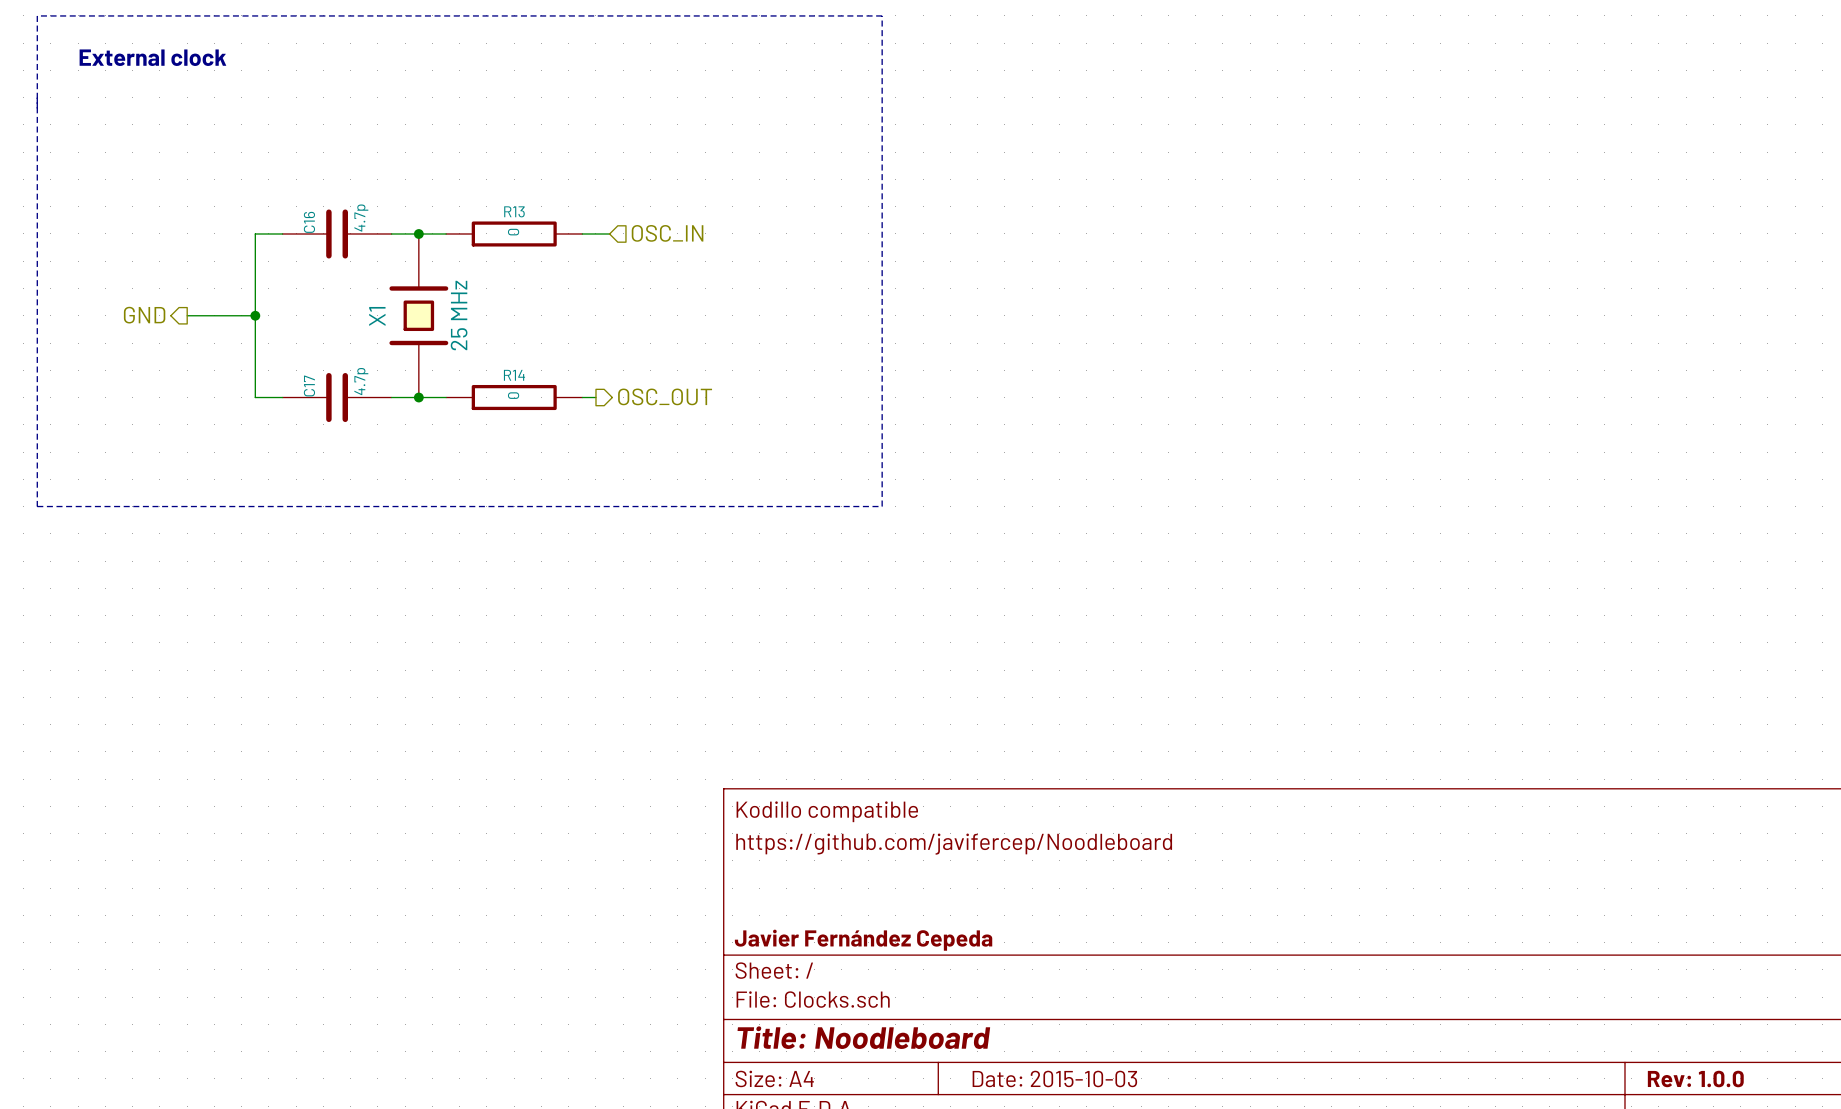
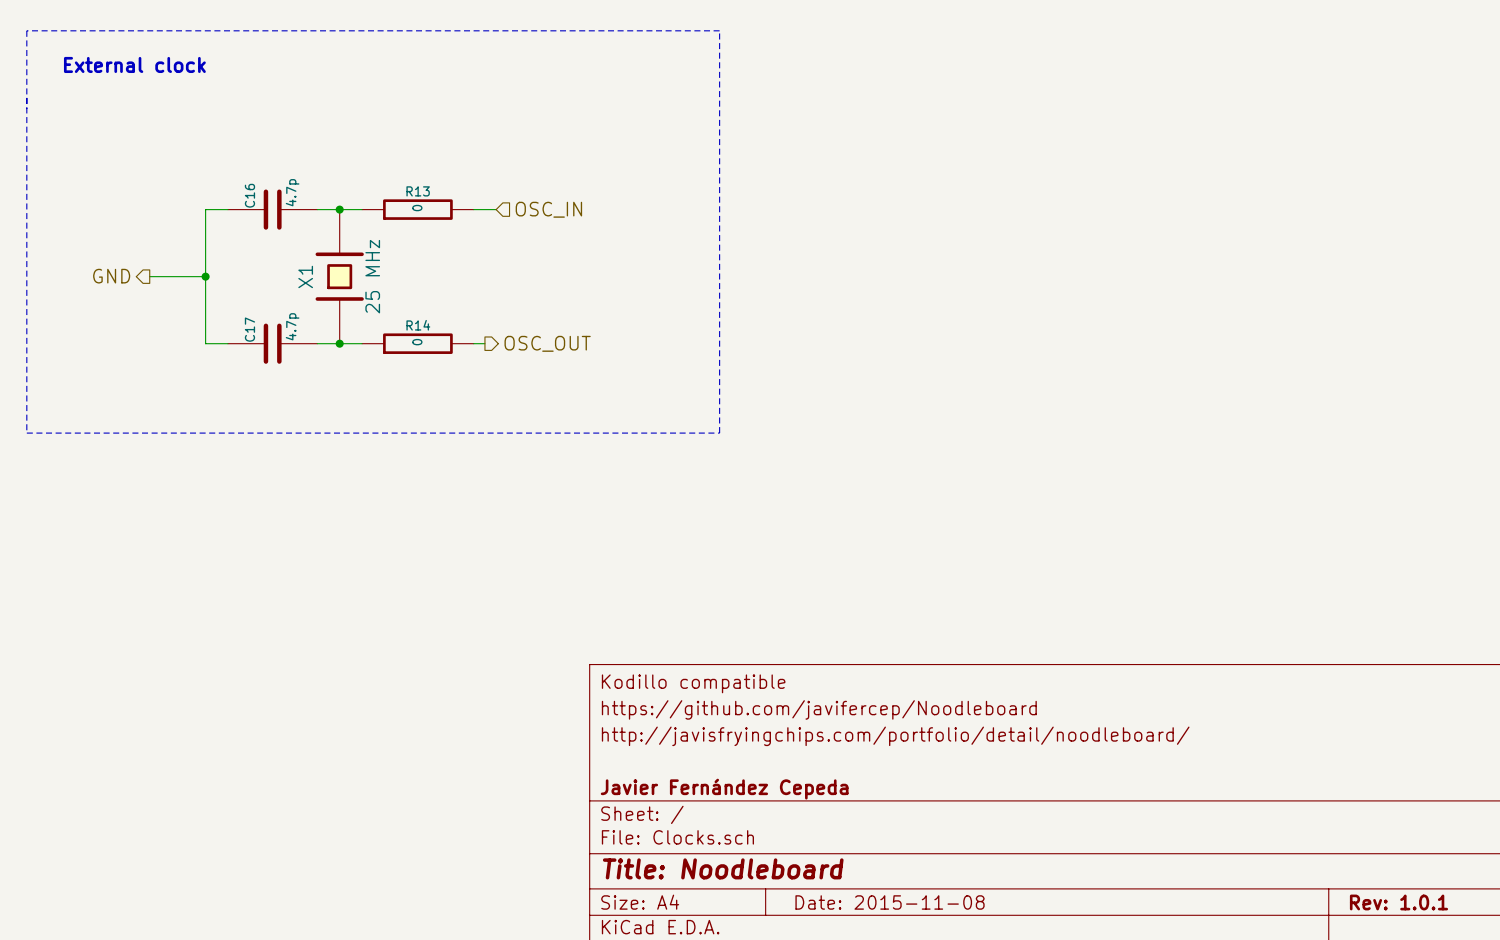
title block: none -> http://javisfryingchips.com/portfolio/detail/noodleboard/ (895, 736)
title block: Date: 2015-10-03 (1054, 1078) -> Date: 2015-11-08 (890, 902)
title block: Rev: 1.0.0 (1695, 1079) -> Rev: 1.0.1 (1398, 902)

